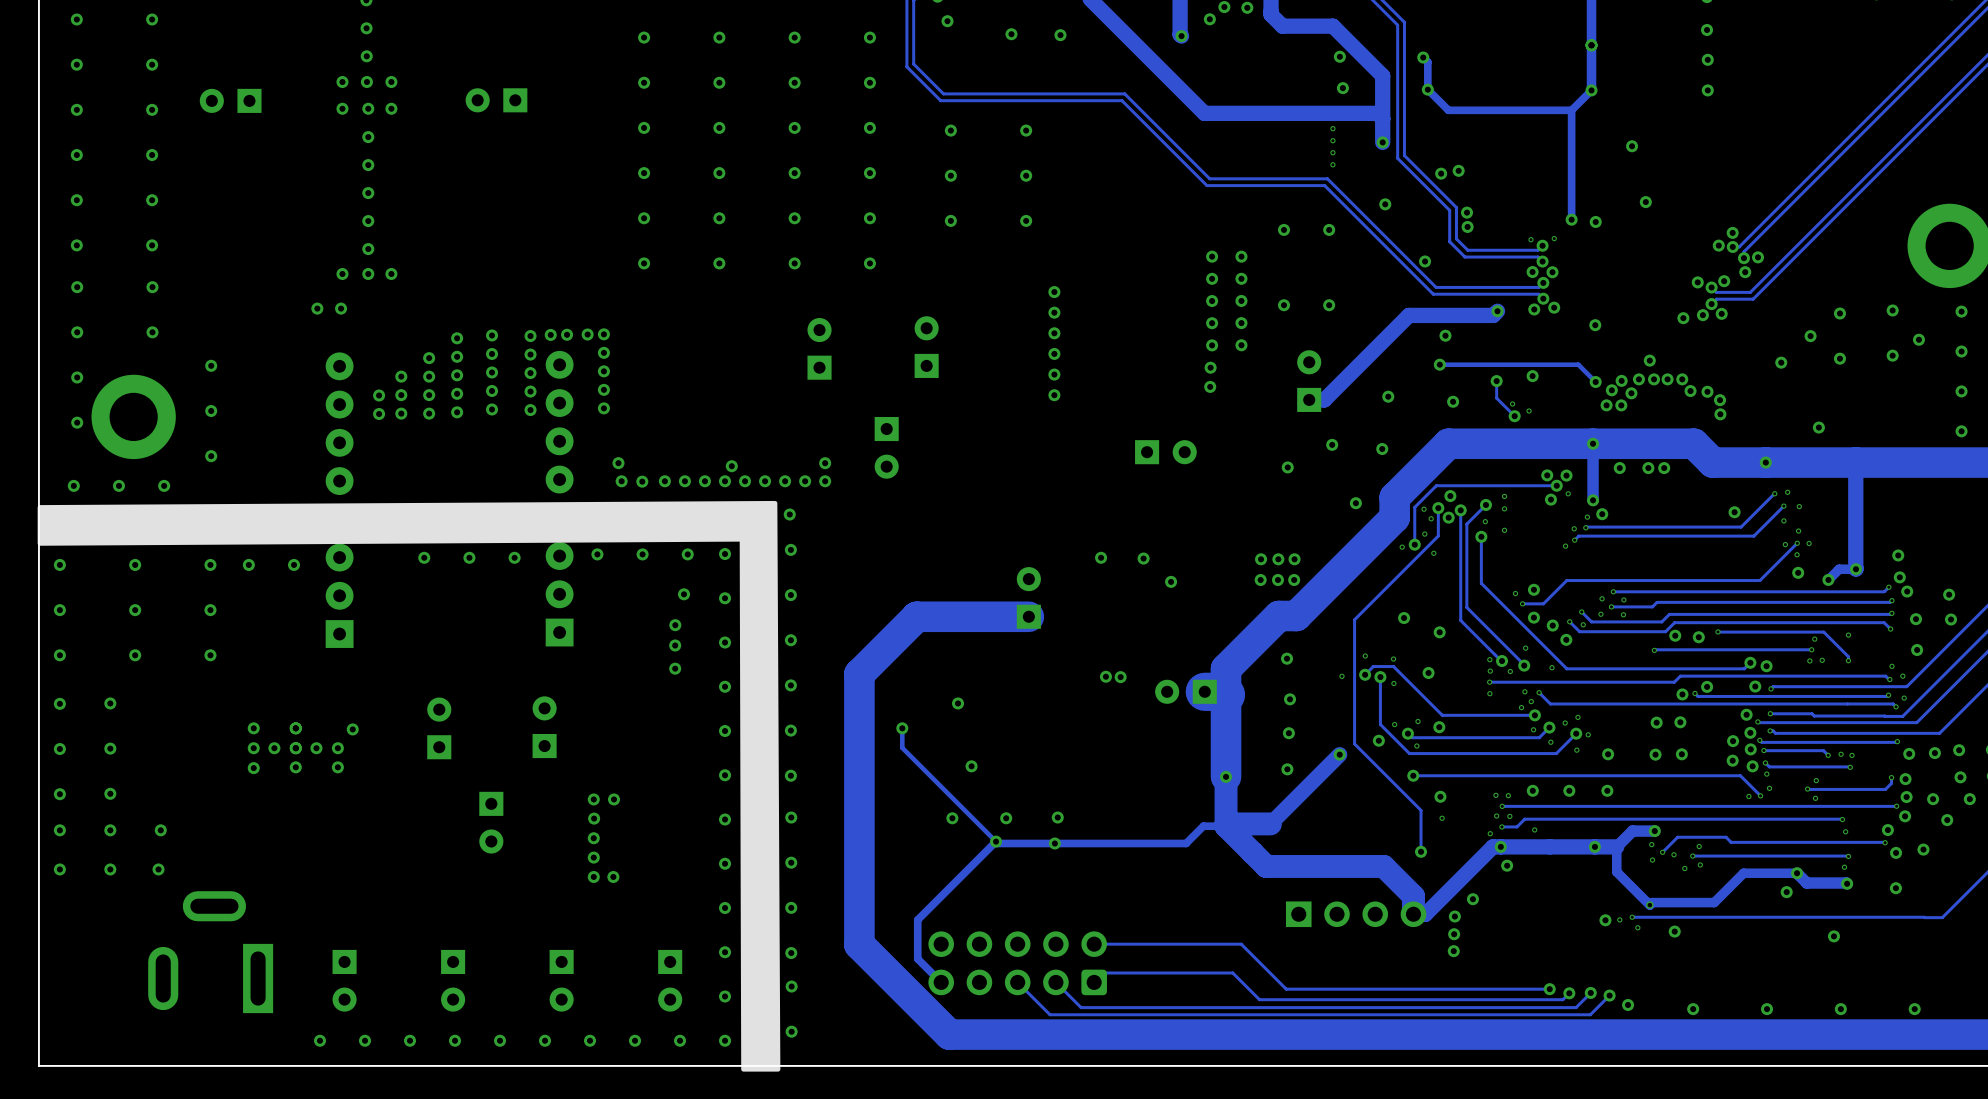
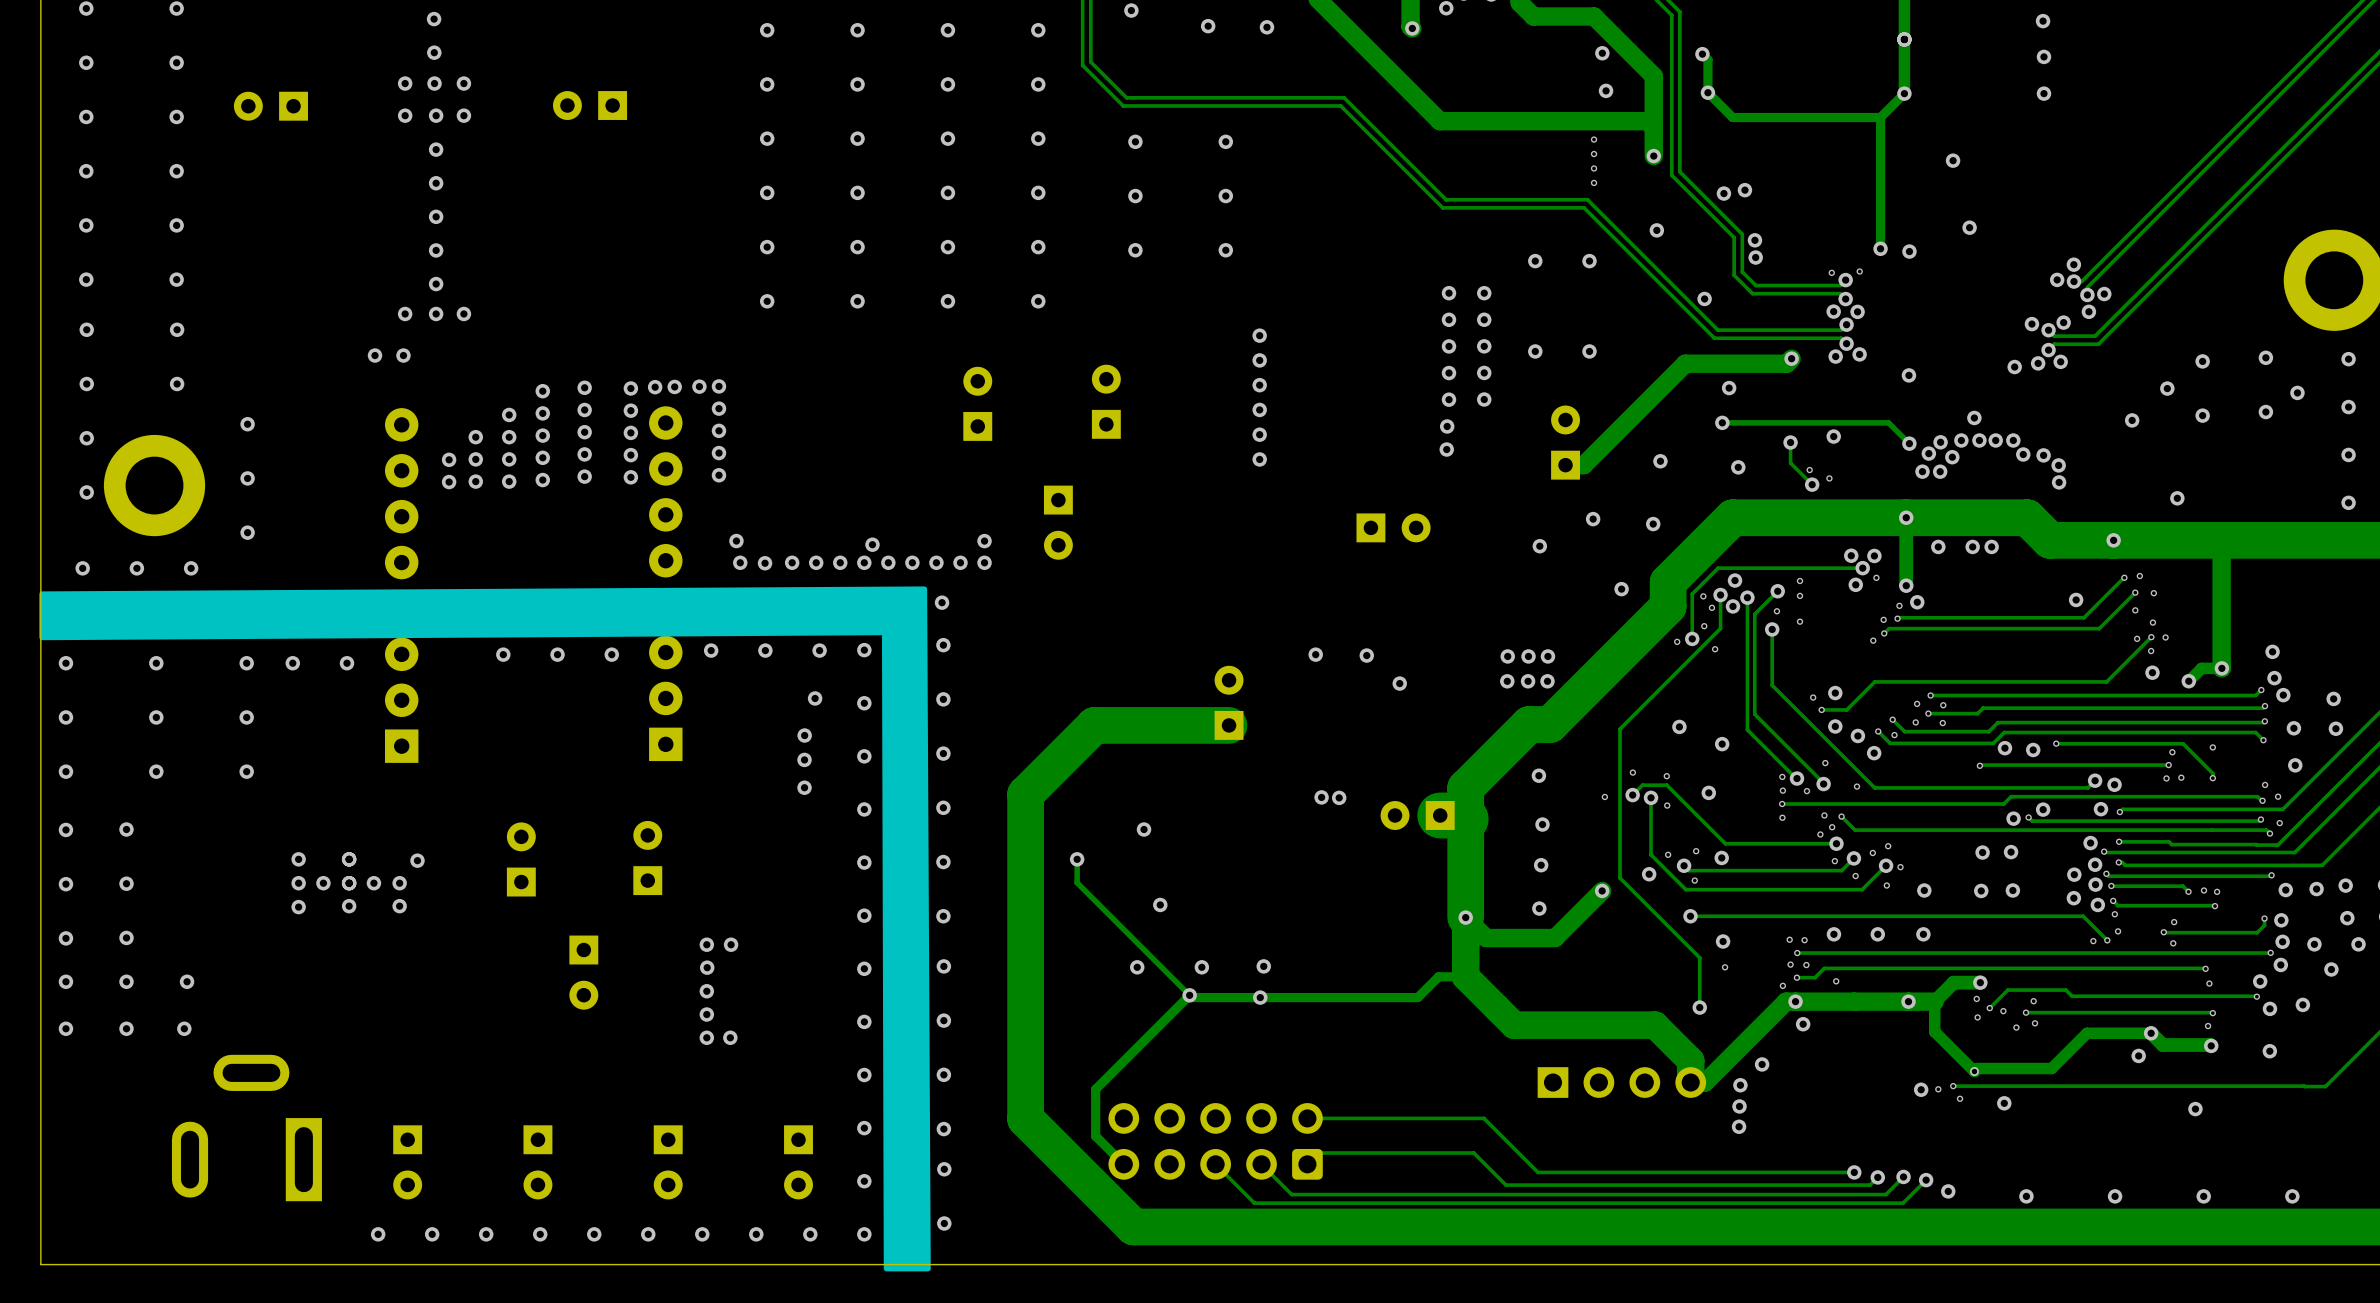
track: (1300, 793) (1270, 823) (1226, 823) -> (1555, 938) (1486, 938) (1465, 917)

